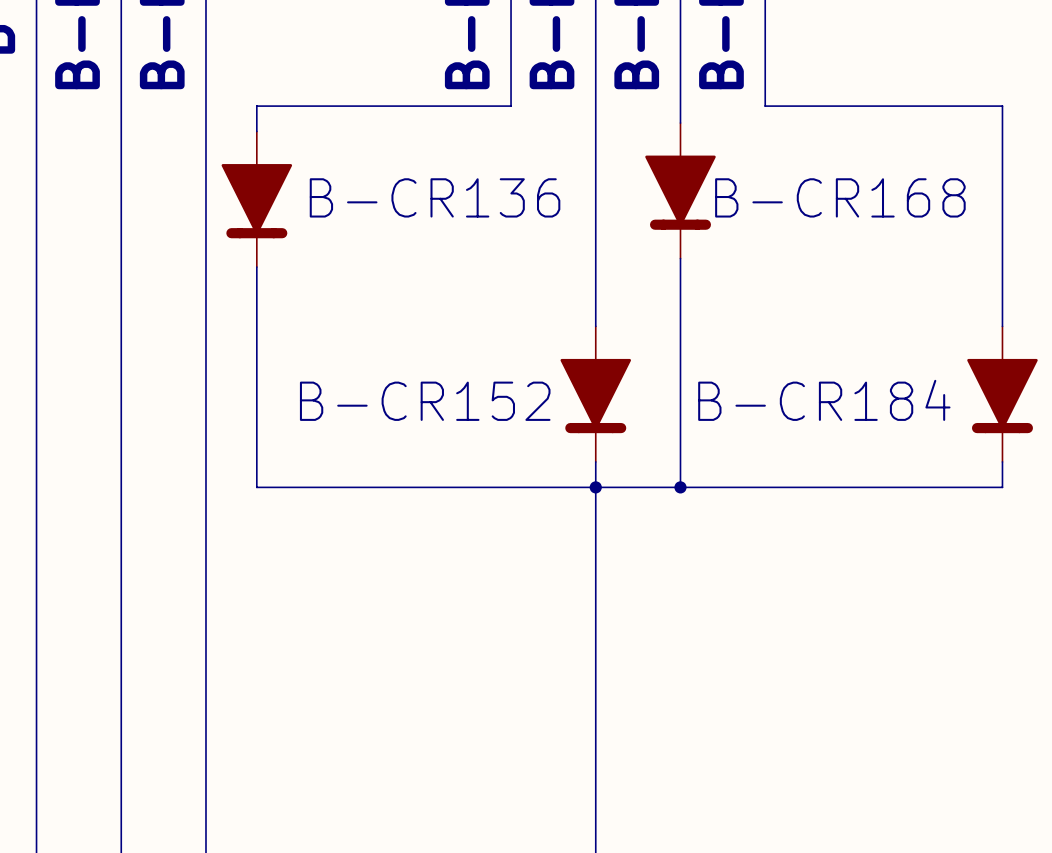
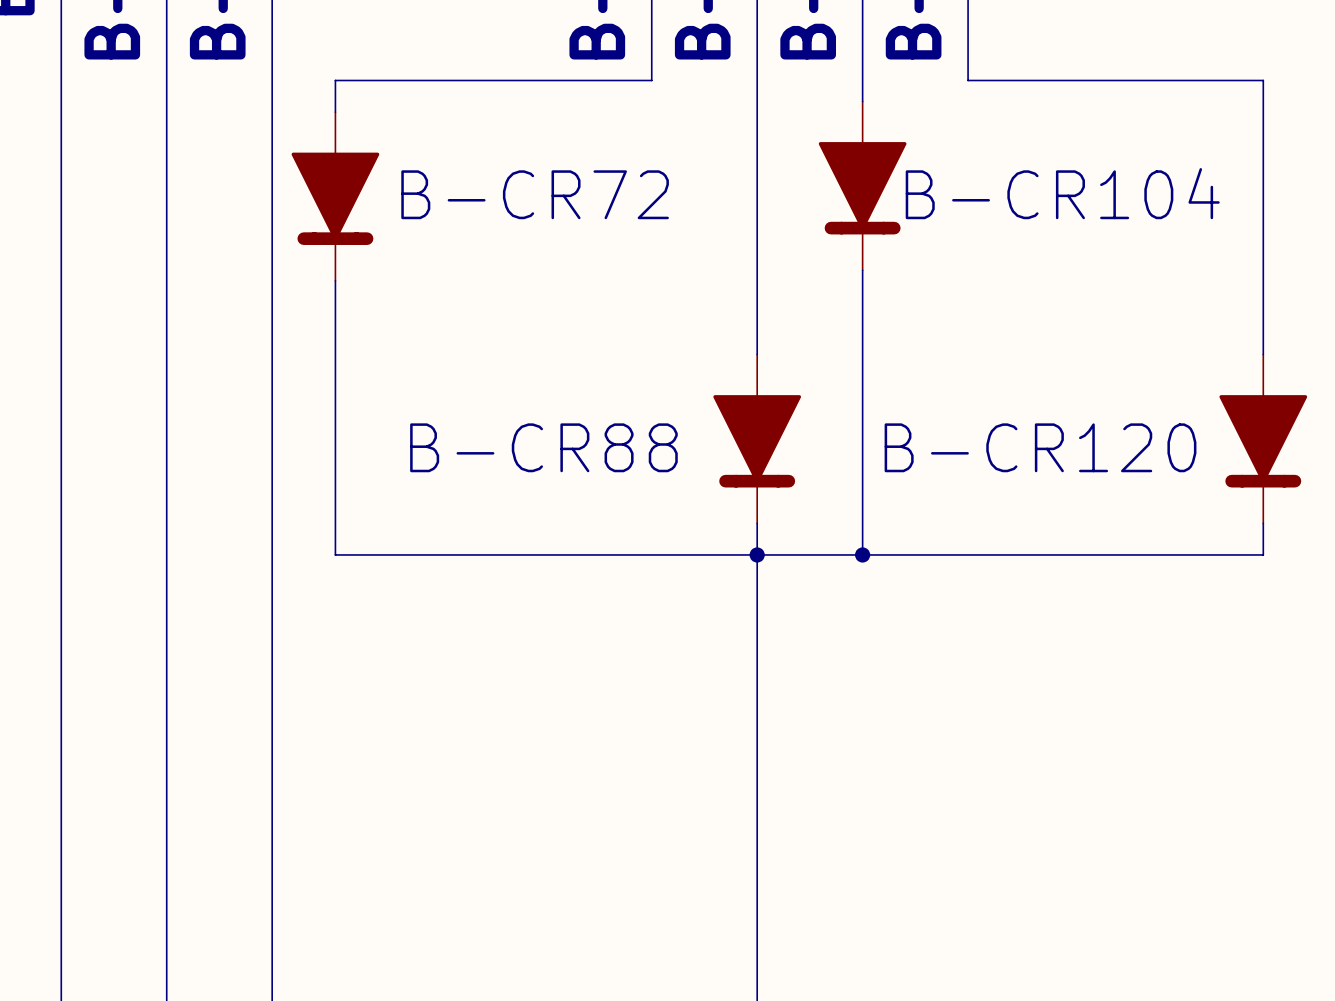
B-CR136 name: B-CR136 (435, 197) -> B-CR72 (535, 194)
B-CR168 name: B-CR168 (840, 197) -> B-CR104 (1062, 193)
B-CR184 name: B-CR184 (824, 400) -> B-CR120 (1040, 447)
B-CR152 name: B-CR152 (425, 401) -> B-CR88 (543, 447)

